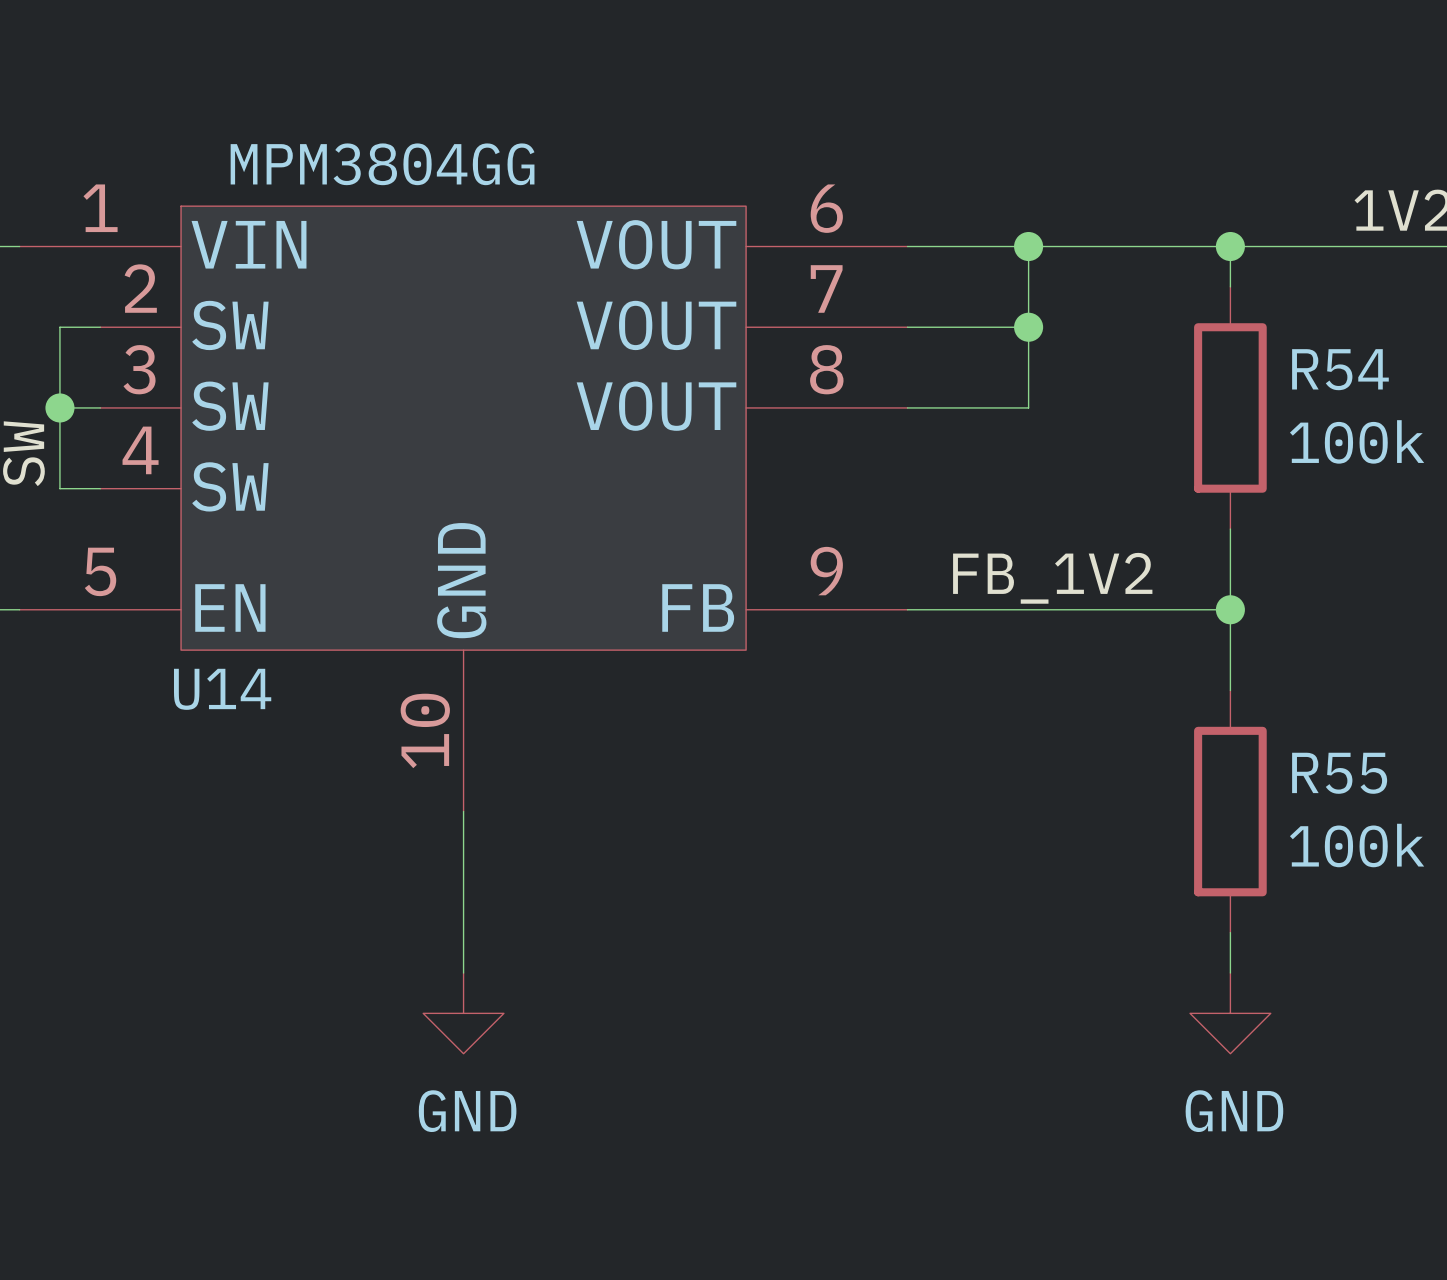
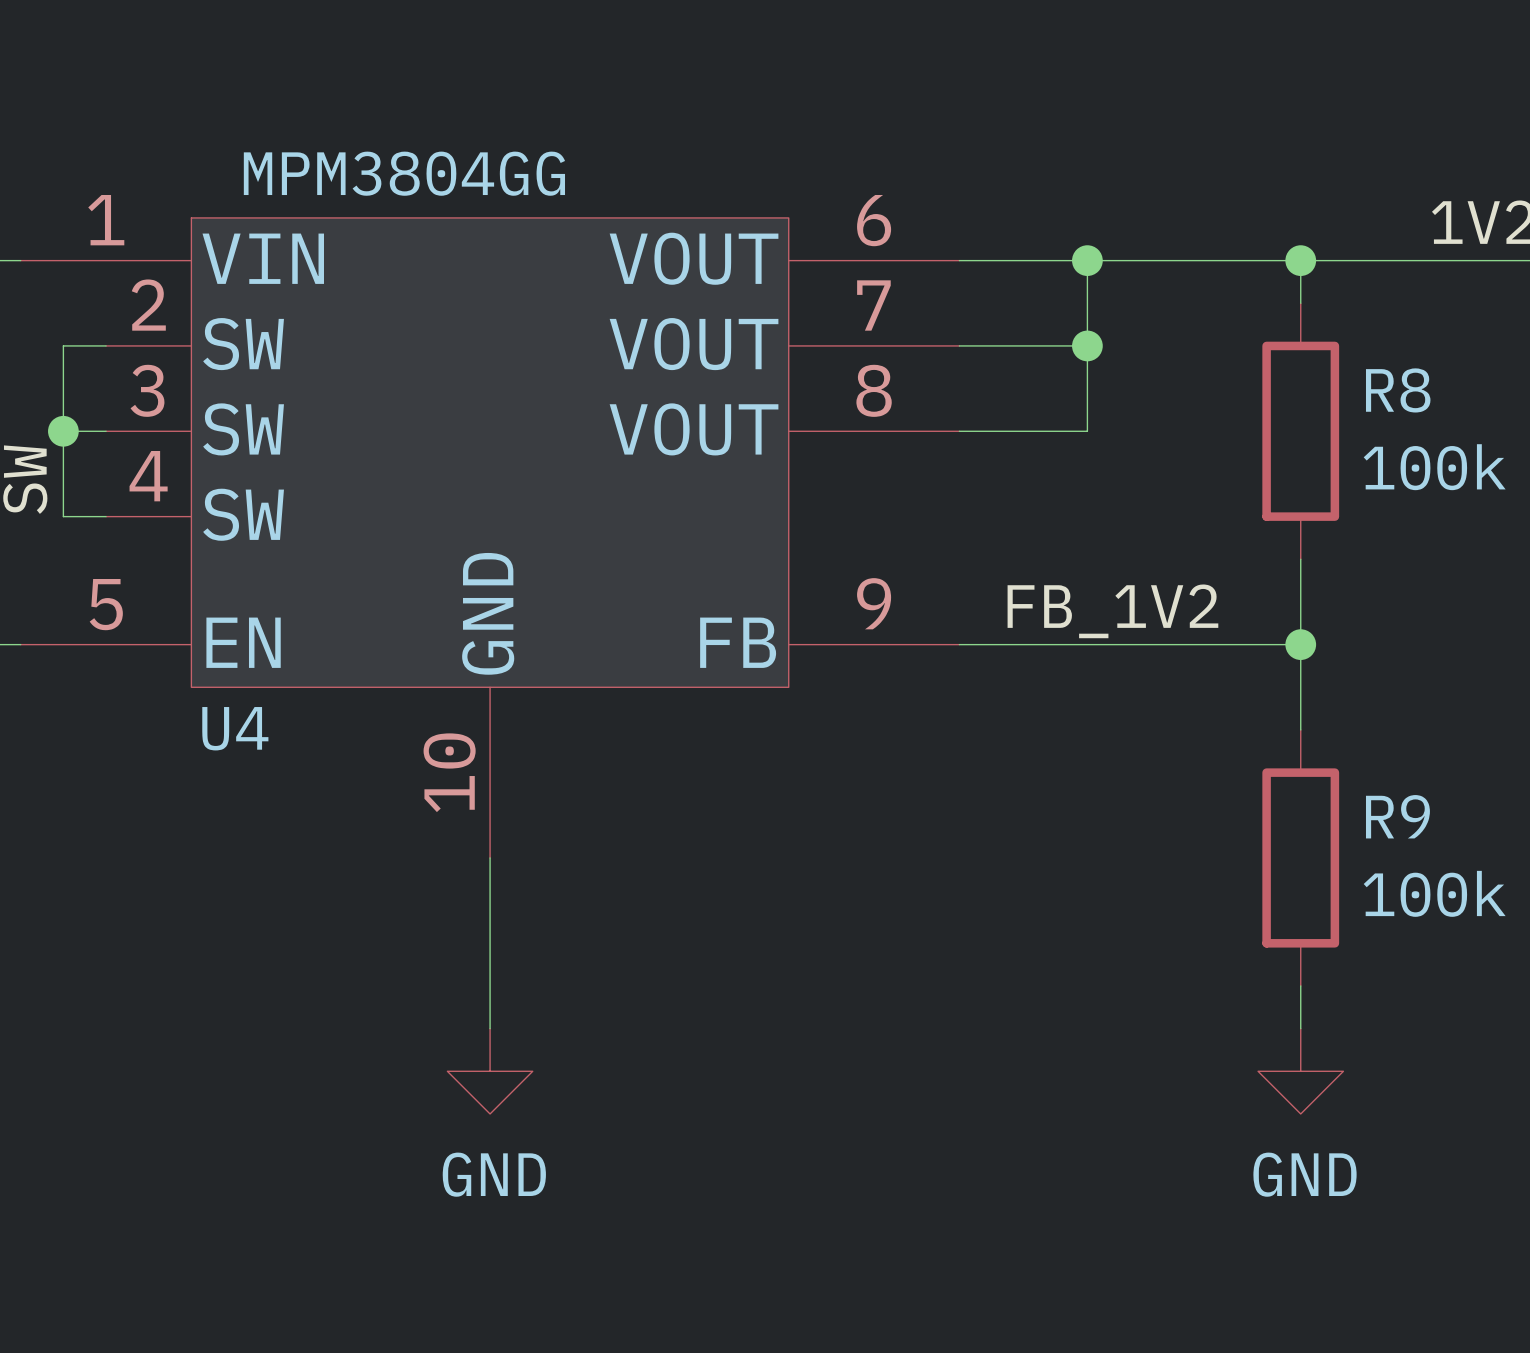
R54 name: R54 (1340, 369) -> R8 (1398, 390)
U14 name: U14 (222, 689) -> U4 (235, 728)
R55 name: R55 (1339, 773) -> R9 (1397, 816)

